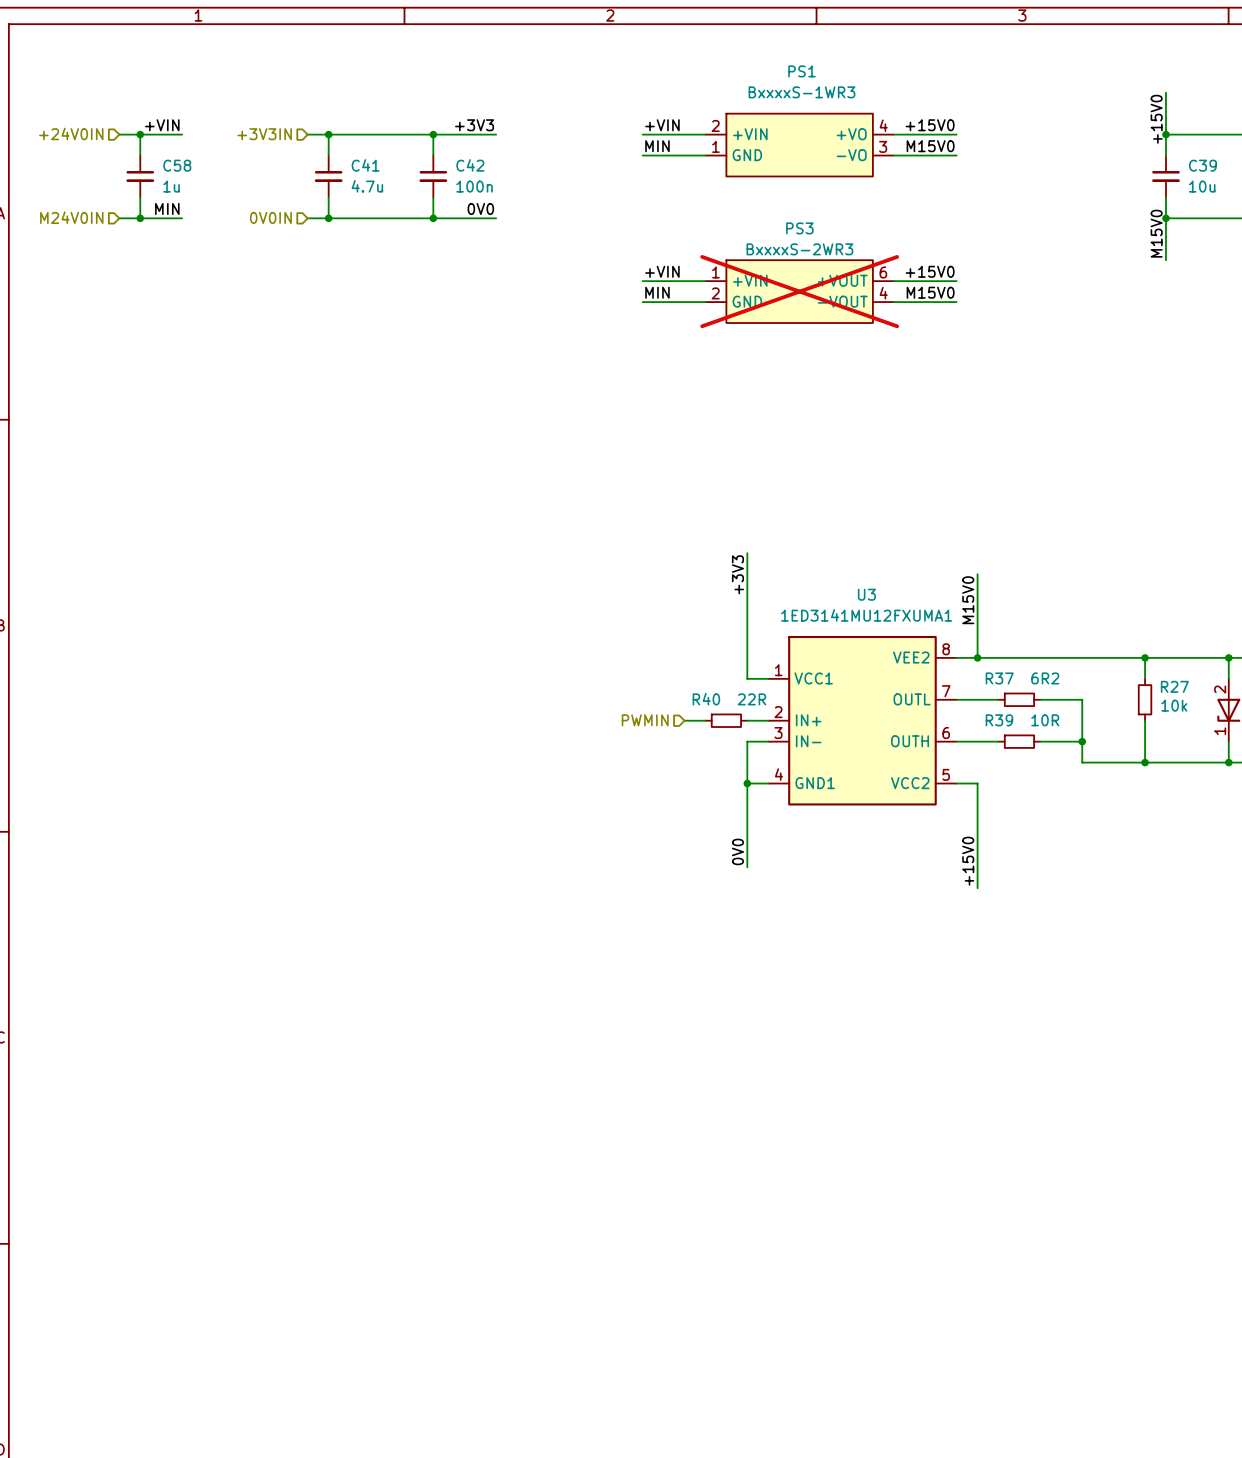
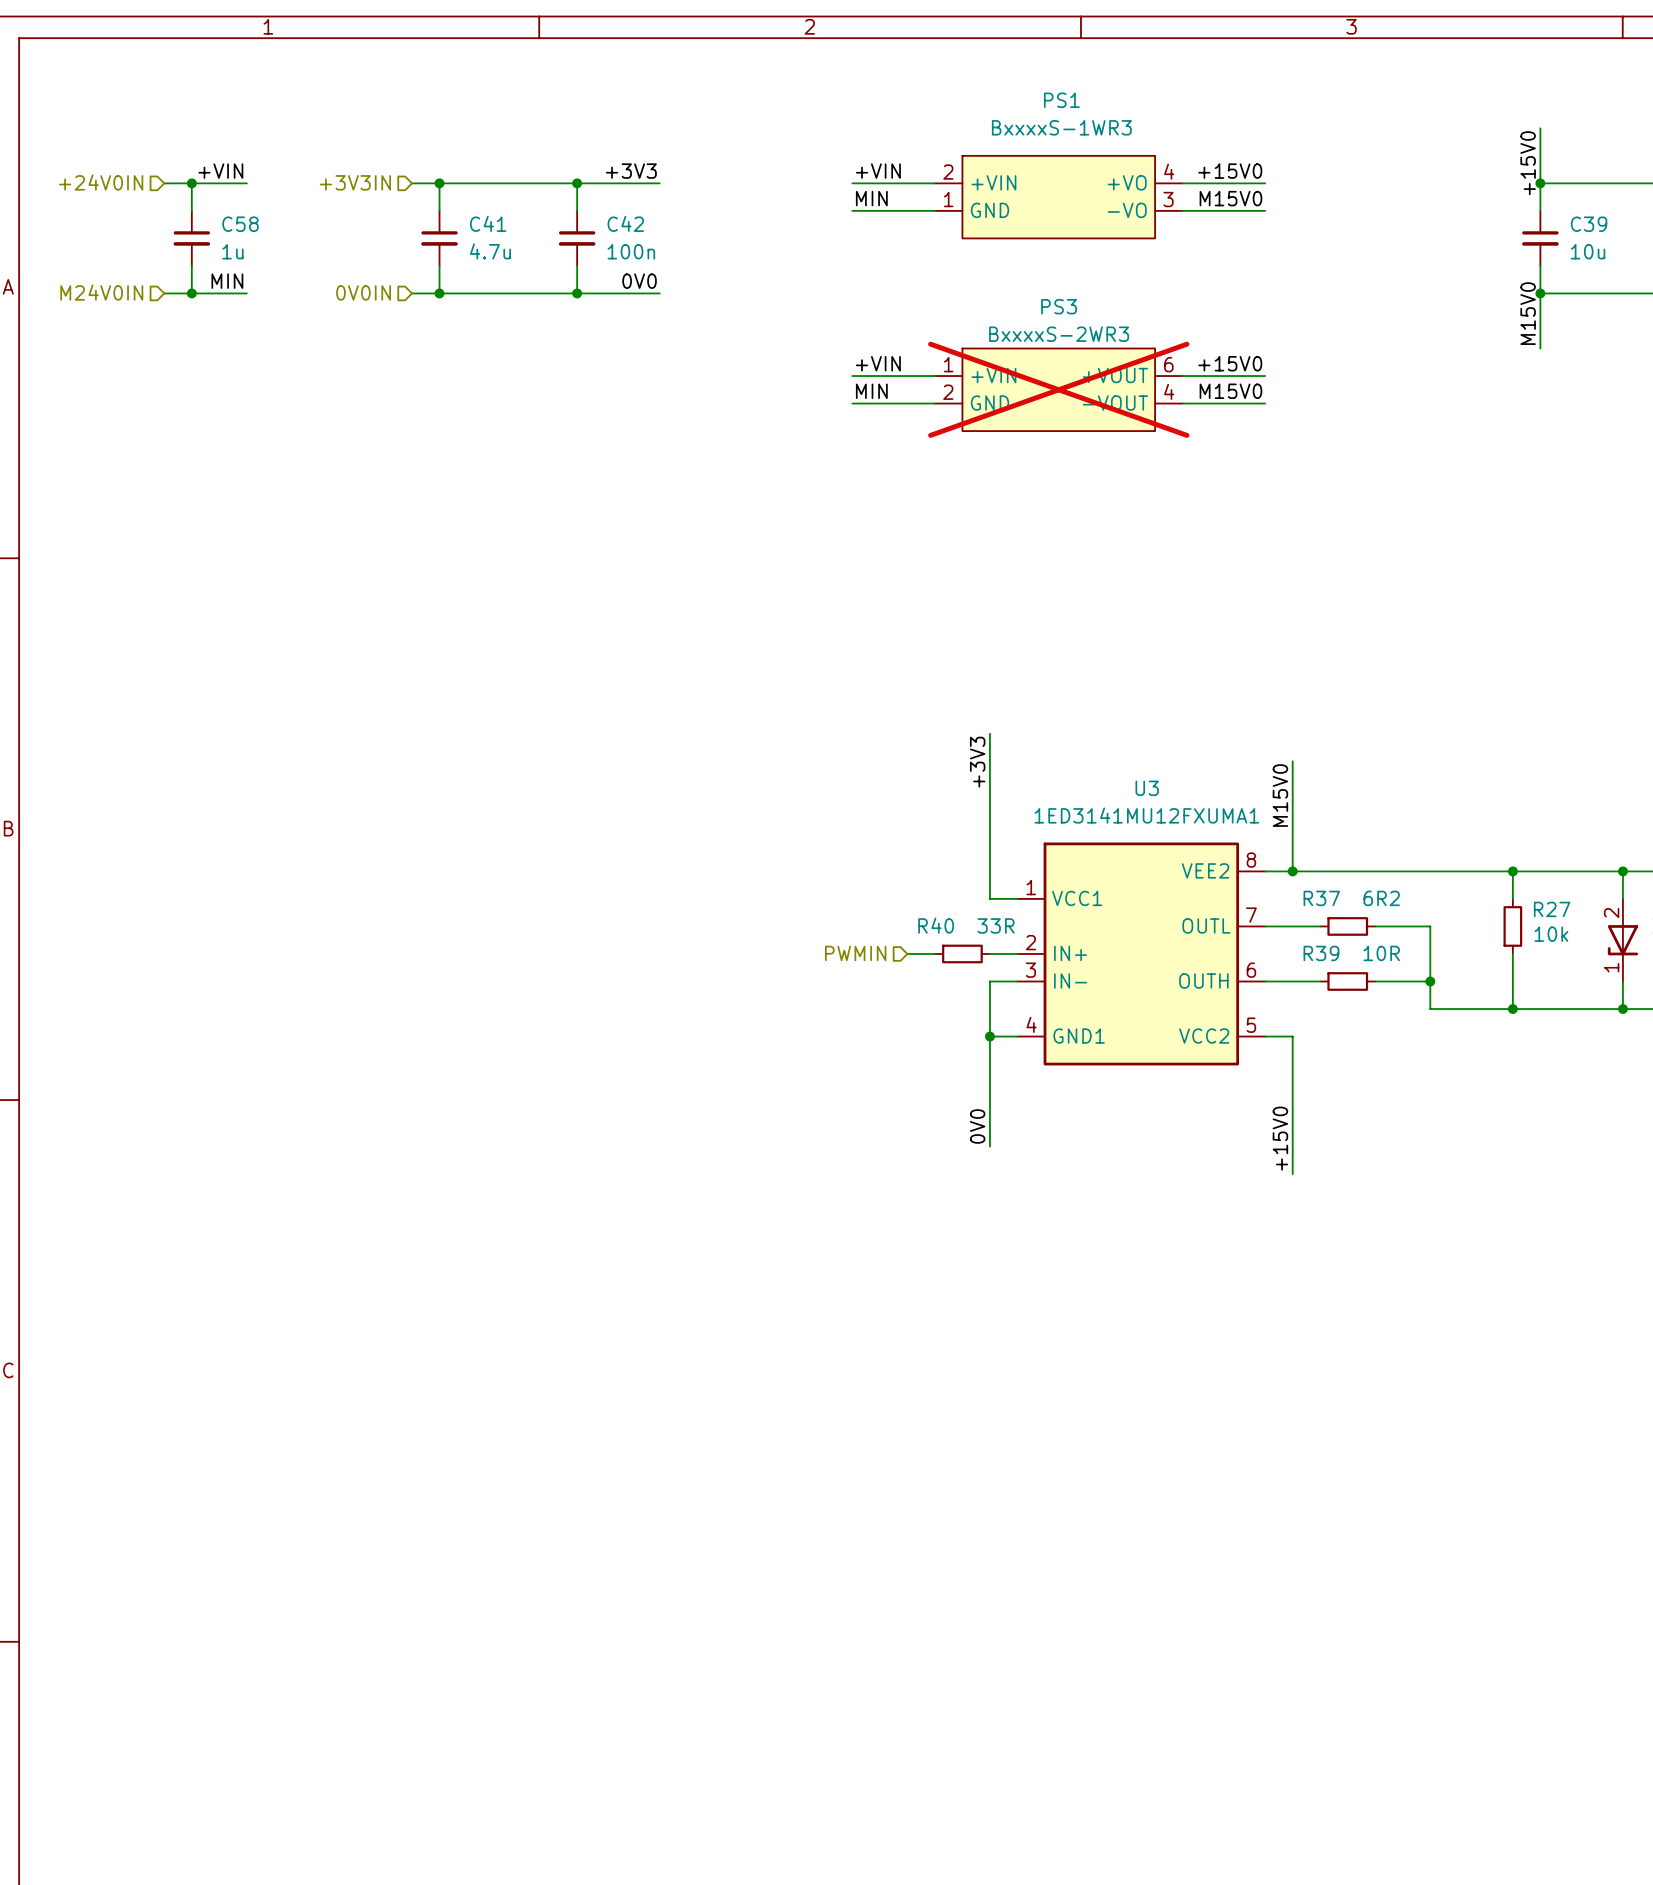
R40 value: 22R (751, 699) -> 33R (996, 925)

